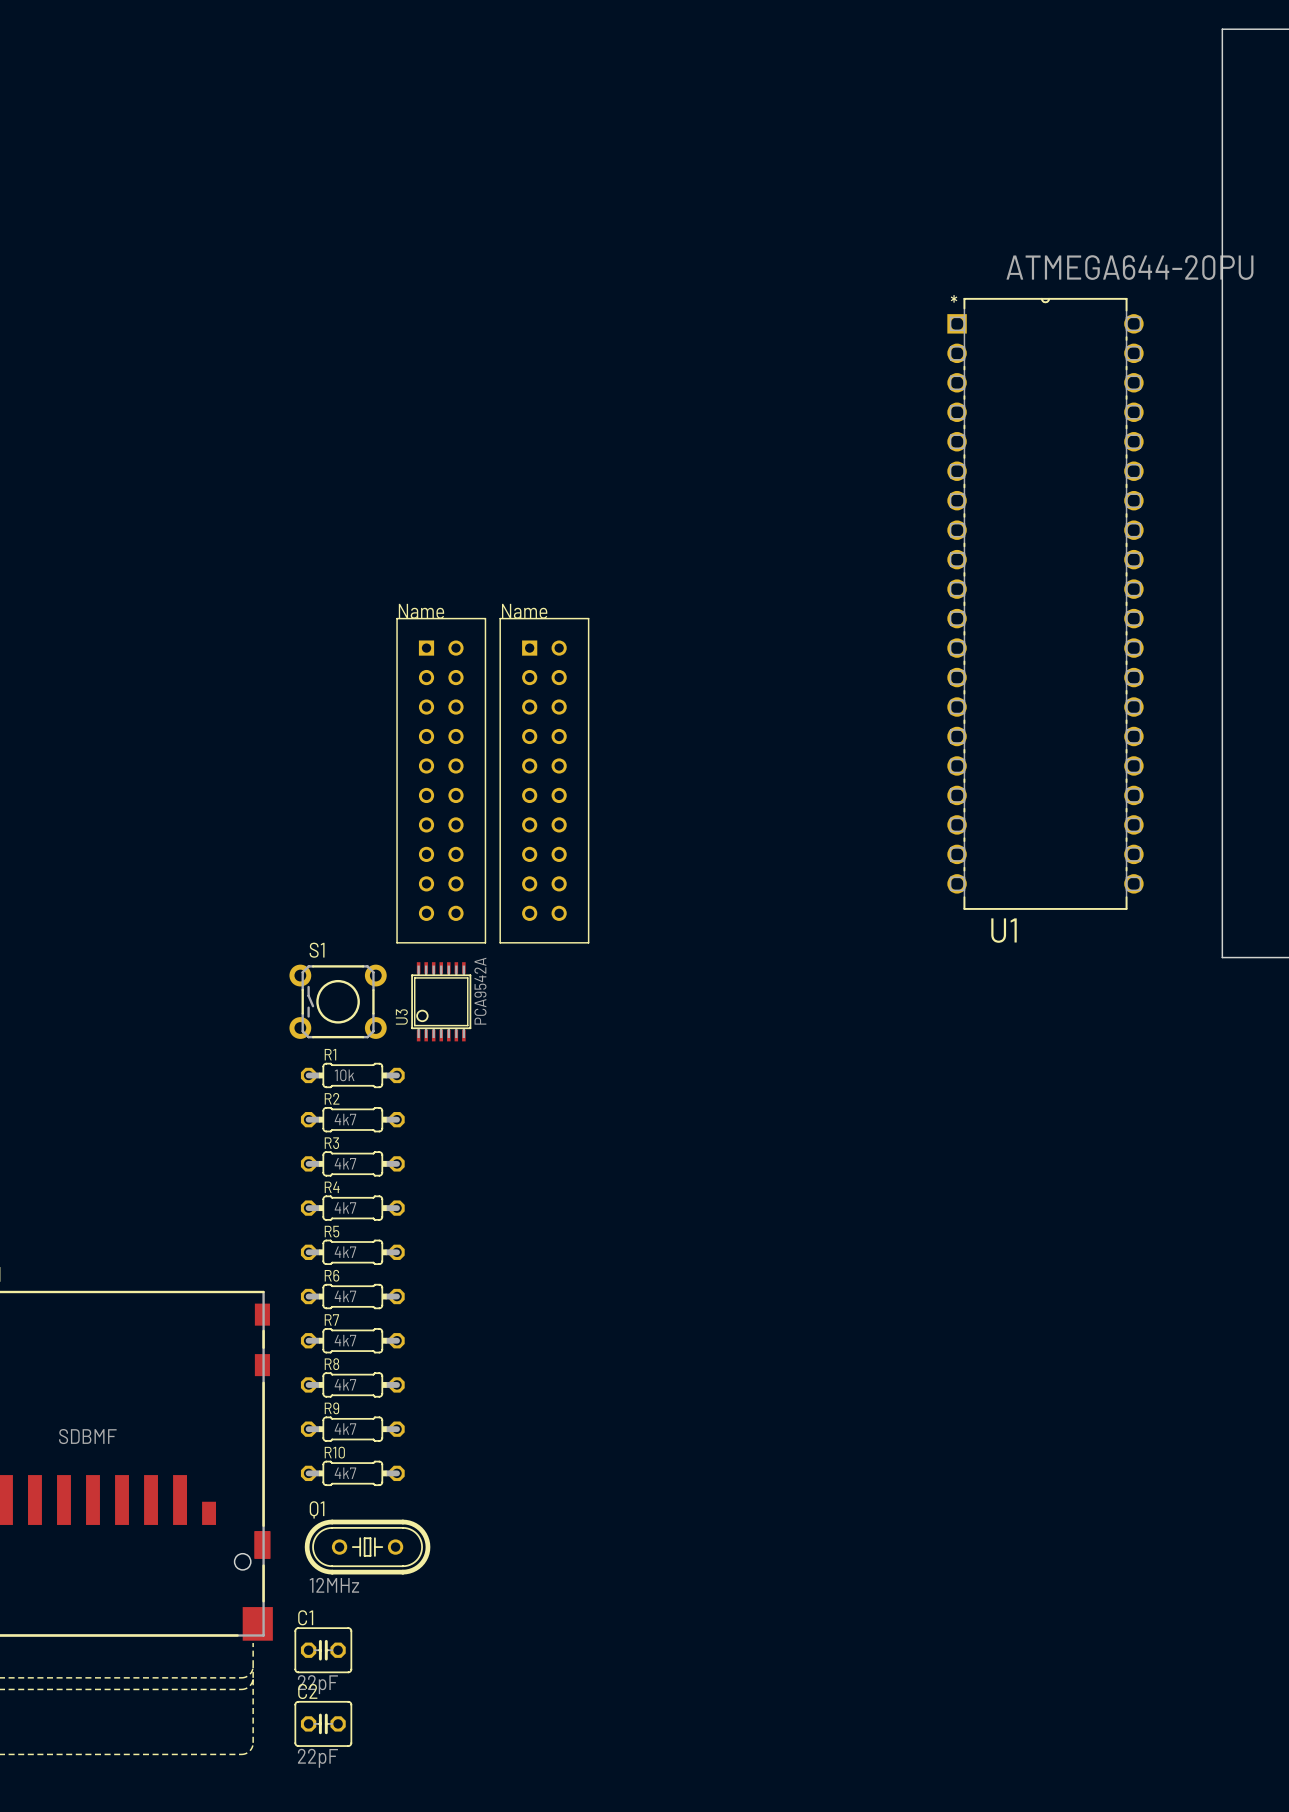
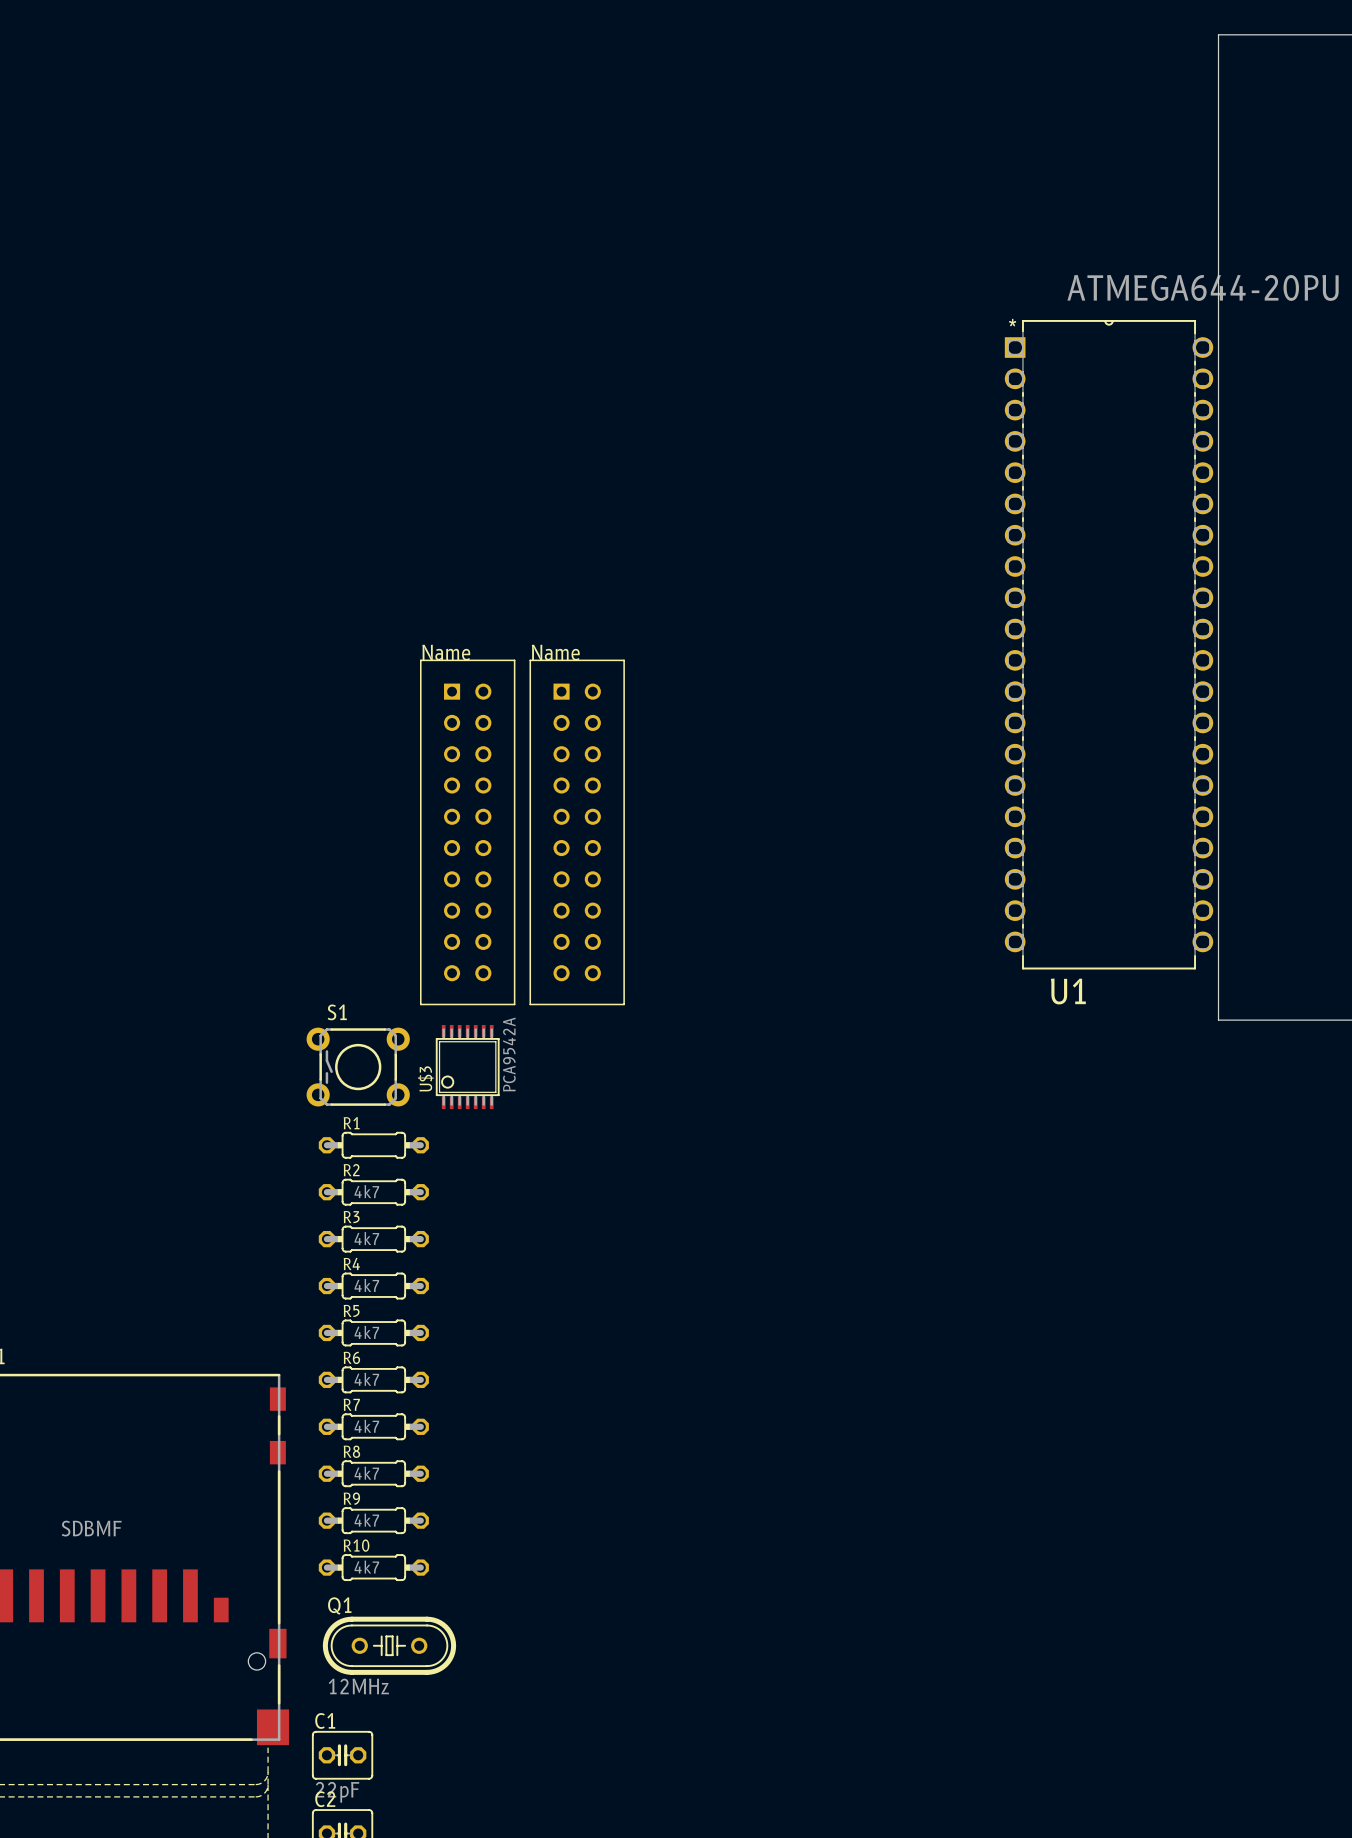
board edge: (1222, 29) (1222, 957) -> (1296, 34) (1218, 34) (1218, 1020) (1296, 1020)
U3 name: U3 (401, 1016) -> U$3 (425, 1078)
R1 value: 10k (344, 1075) -> none

